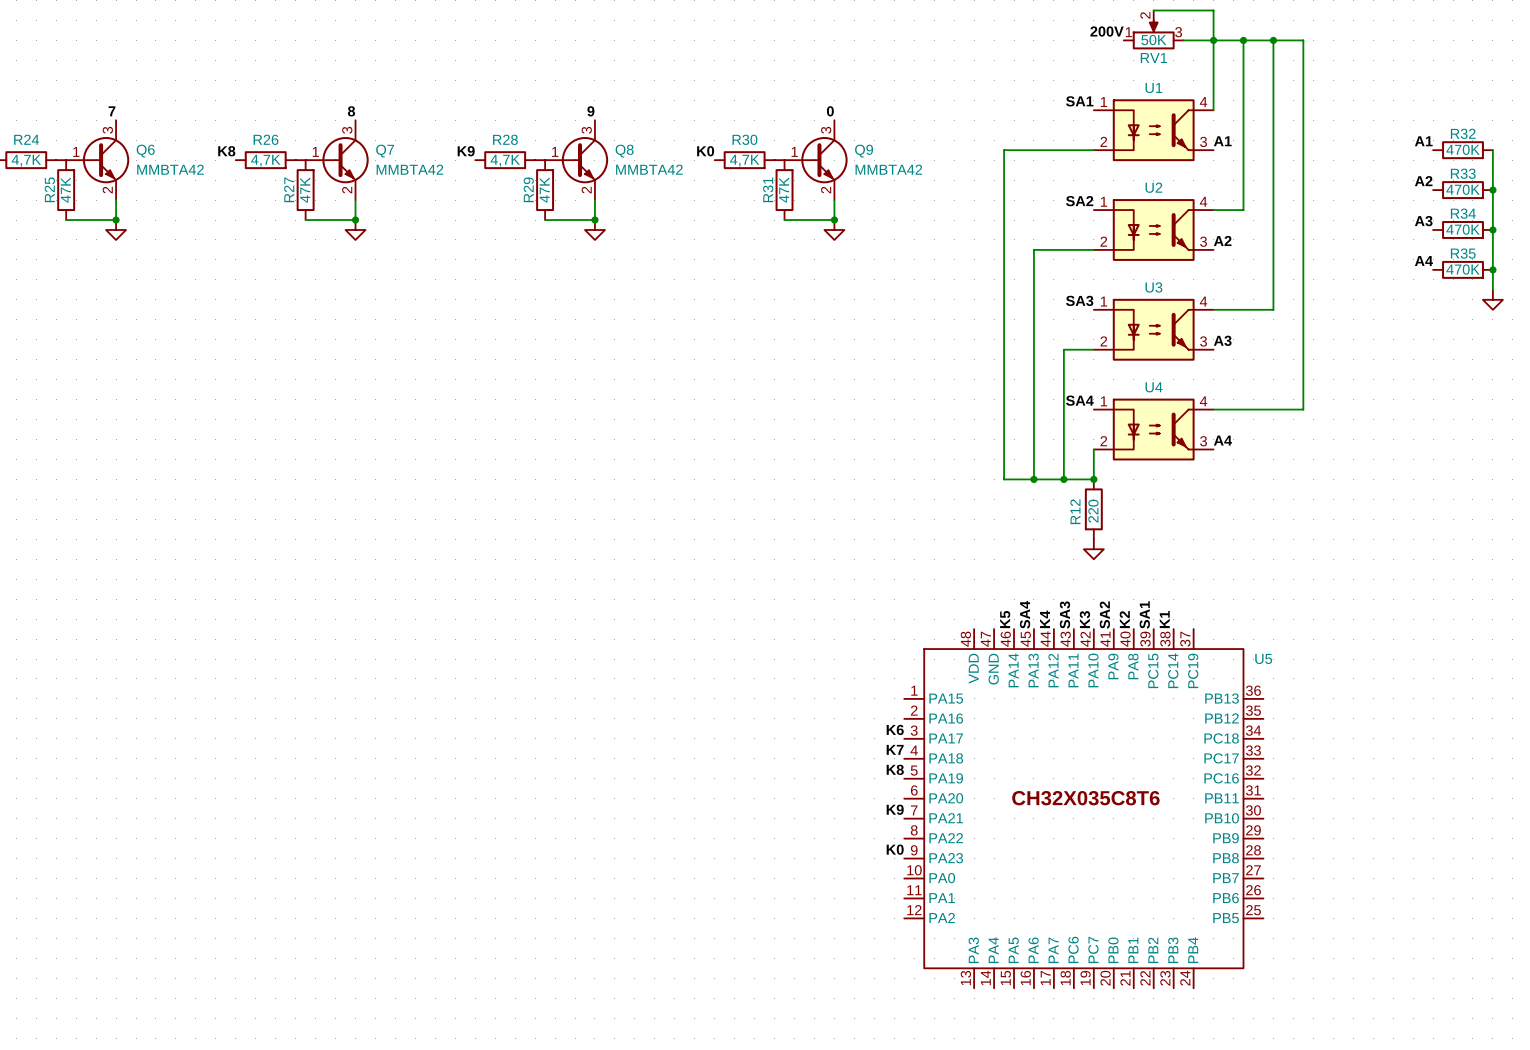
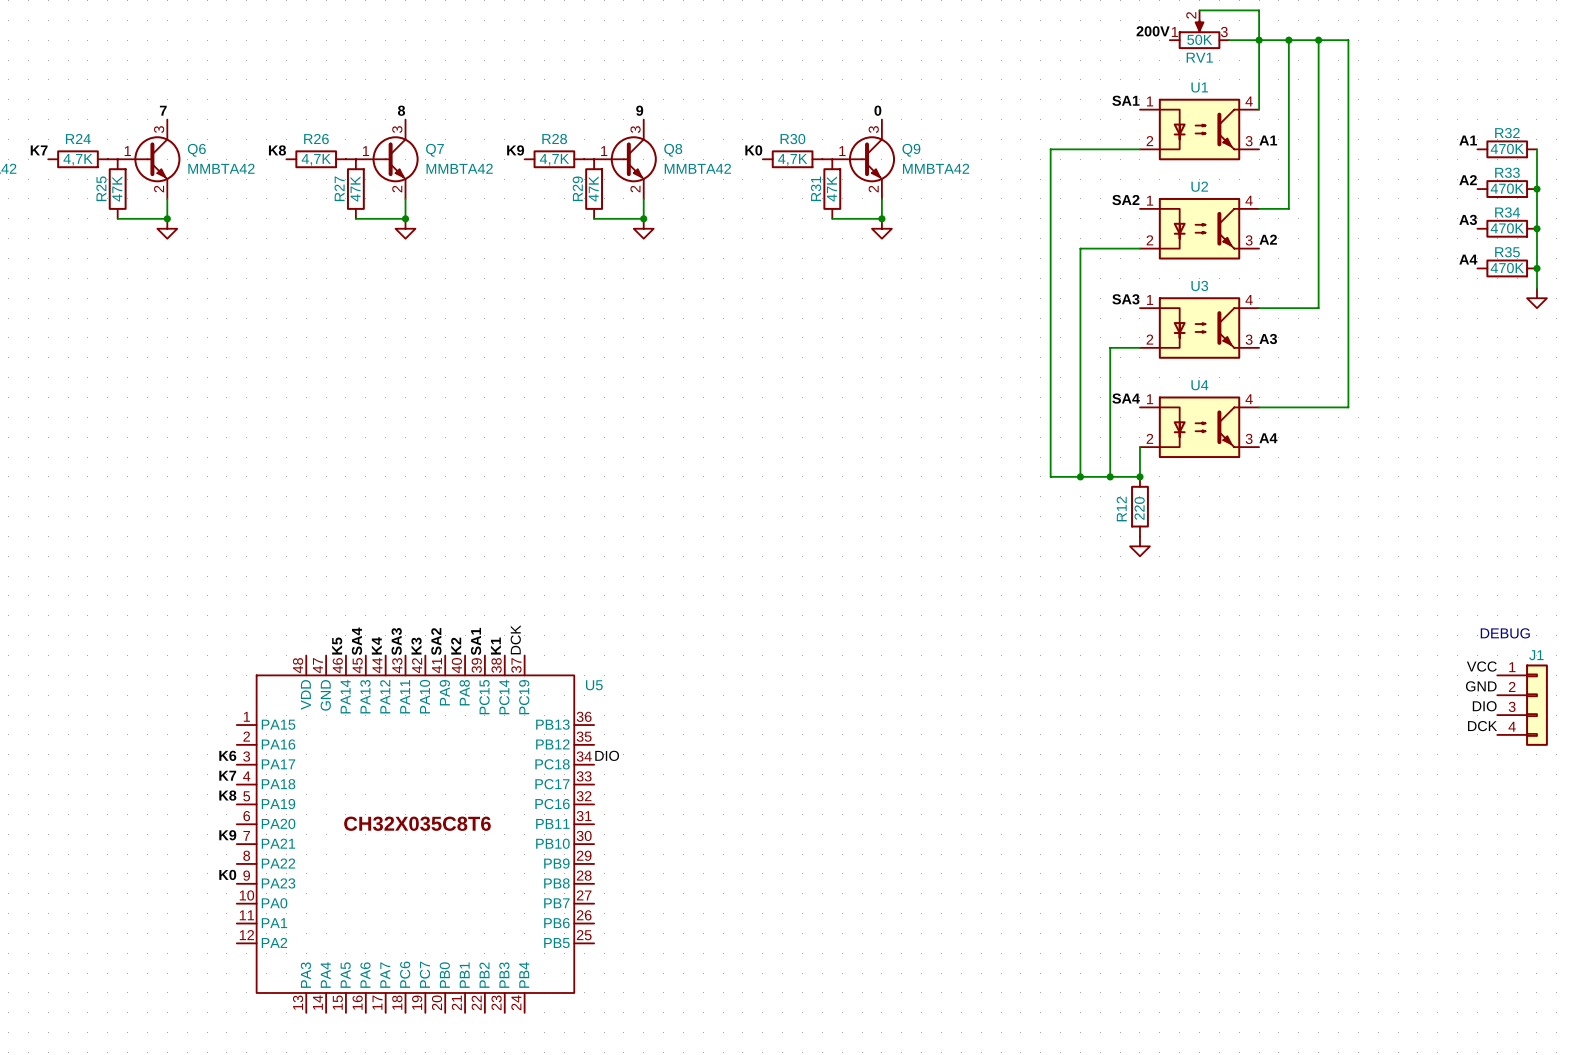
label: SA4 (1025, 614) -> none
label: SA1 (1144, 614) -> none
label: SA3 (1064, 615) -> none
label: SA2 (1104, 615) -> none
label: K5 (1005, 619) -> none
label: K4 (1045, 619) -> none
label: K3 (1084, 619) -> none
label: K2 (1124, 619) -> none
label: K1 (1164, 619) -> none
text: none -> DEBUG (1505, 633)
label: none -> DCK (515, 639)
label: none -> SA4 (356, 641)
label: none -> SA3 (396, 641)
label: none -> SA2 (436, 641)
label: none -> SA1 (476, 641)
label: none -> K5 (337, 646)
label: none -> K4 (376, 645)
label: none -> K3 (416, 646)
label: none -> K2 (456, 646)
label: none -> K1 (495, 646)
label: none -> VCC (1481, 666)
label: none -> GND (1481, 686)
J1: none -> (1522, 705)
label: none -> DIO (1484, 706)
label: K6 (895, 729) -> none
label: none -> DCK (1482, 726)
label: K7 (895, 749) -> none
label: none -> K6 (227, 755)
label: none -> DIO (607, 755)
label: K8 (895, 769) -> none
label: none -> K7 (227, 775)
label: none -> K8 (227, 795)
U5 position: (1083, 808) -> (415, 834)
label: K9 (895, 809) -> none
label: none -> K9 (227, 835)
label: K0 (895, 849) -> none
label: none -> K0 (227, 874)

